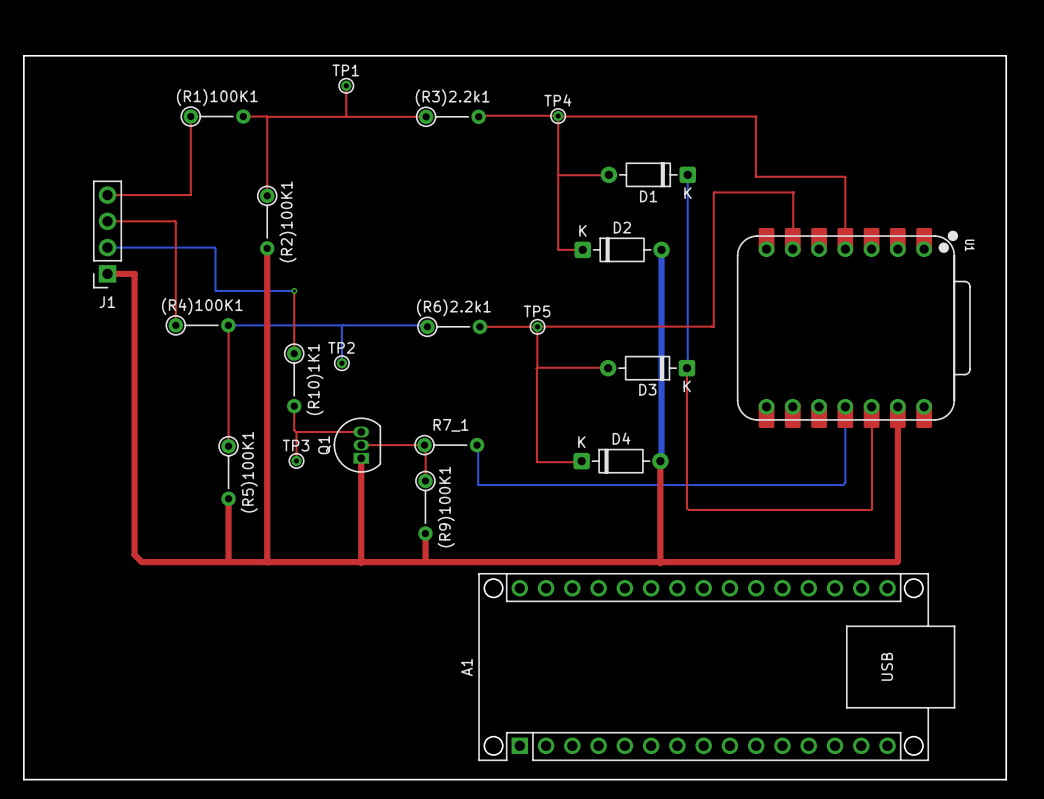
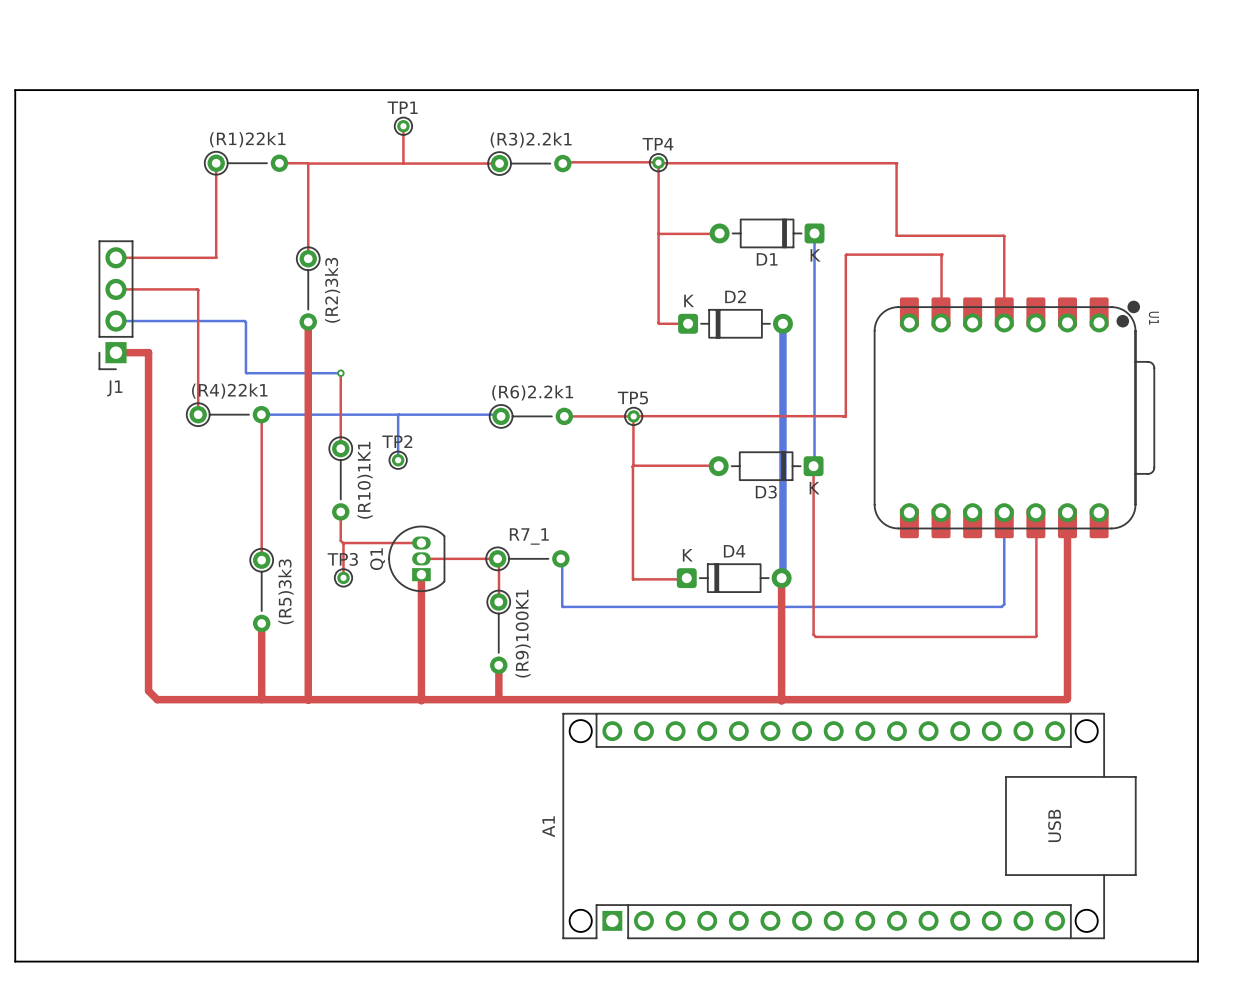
(R1)100K1 name: (R1)100K1 (217, 97) -> (R1)22k1 (247, 139)
(R2)100K1 name: (R2)100K1 (287, 221) -> (R2)3k3 (332, 290)
(R4)100K1 name: (R4)100K1 (202, 306) -> (R4)22k1 (229, 391)
(R5)100K1 name: (R5)100K1 (249, 472) -> (R5)3k3 (285, 591)

